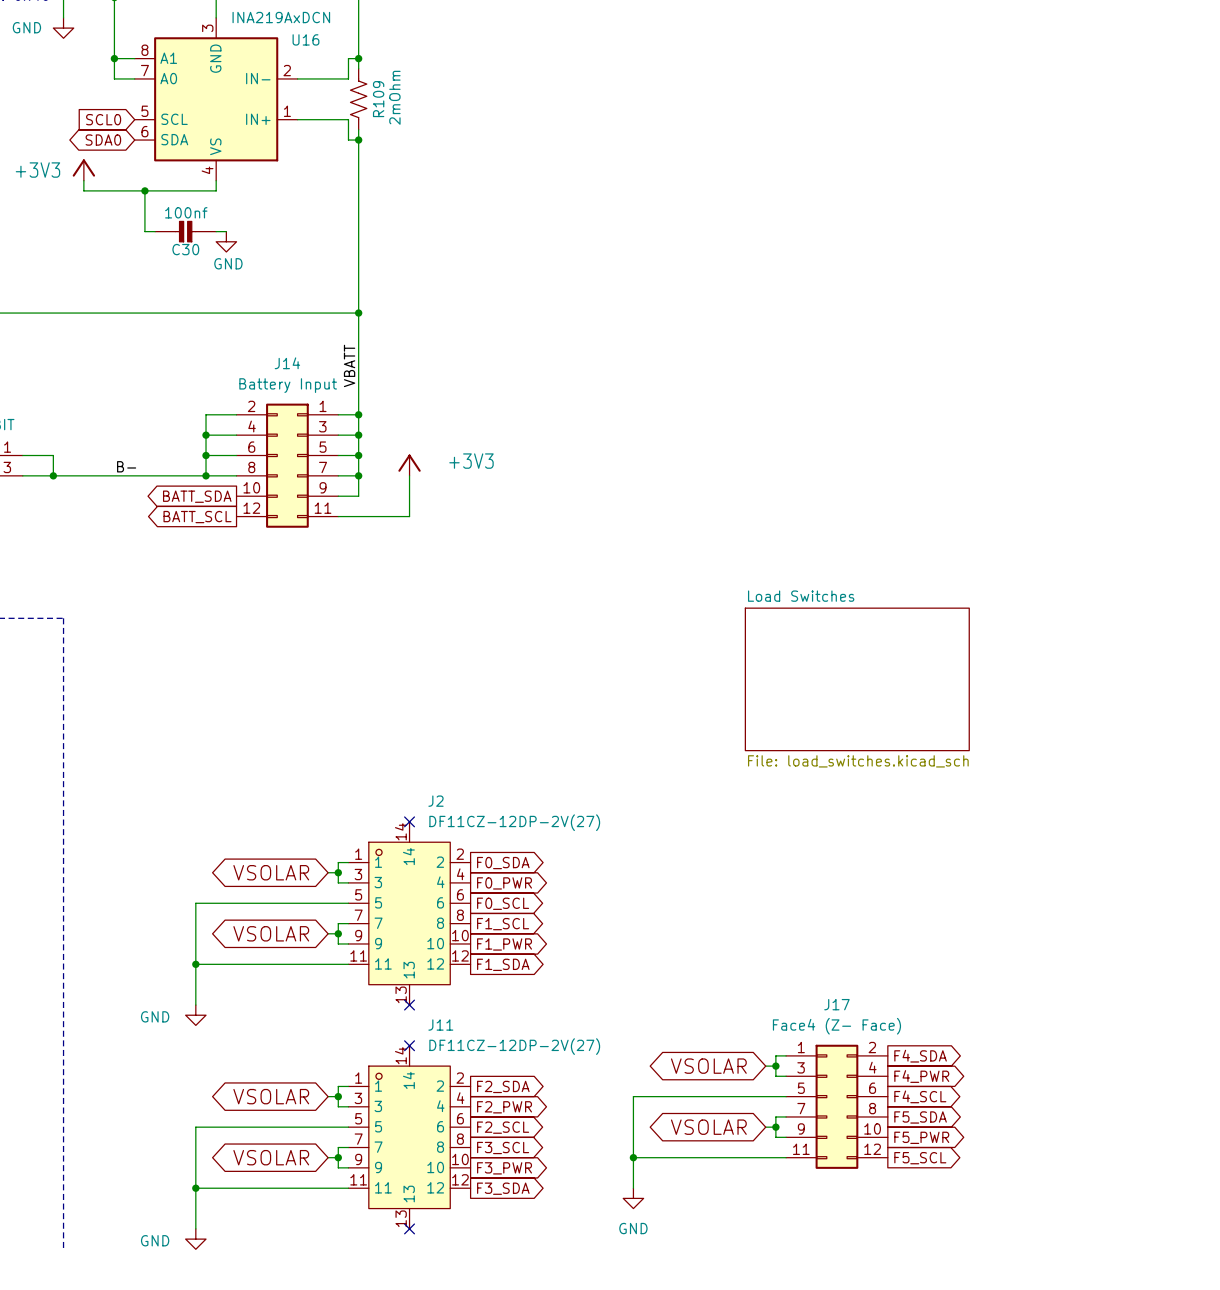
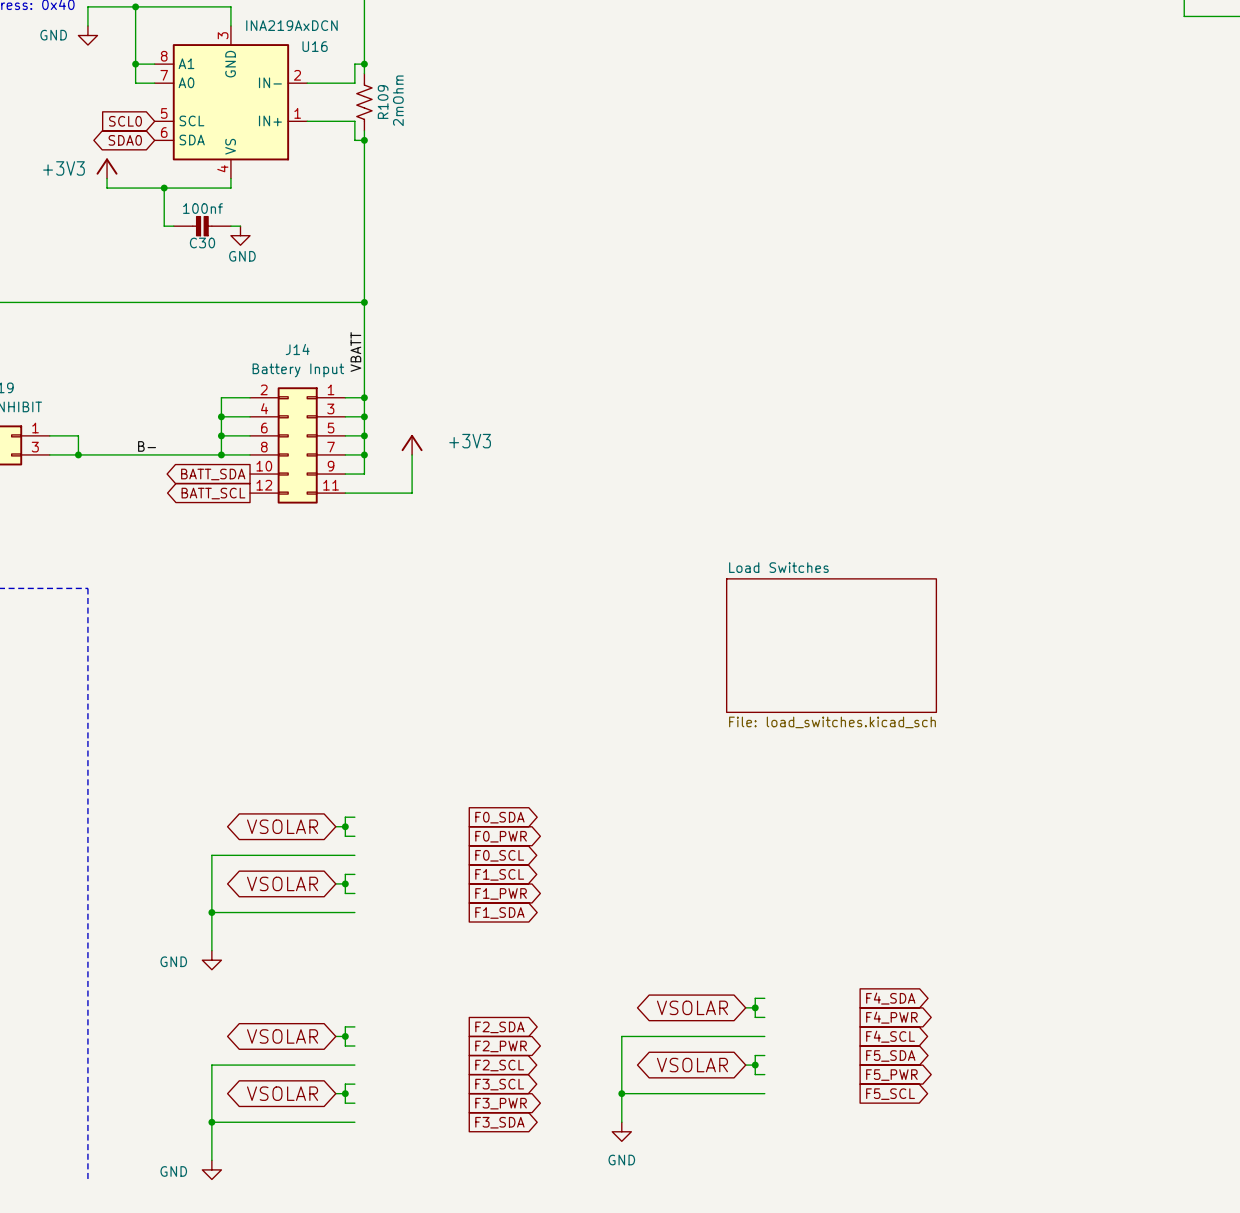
no-connect mark: (409, 821) -> none
J2: DF11CZ-12DP-2V(27) (409, 913) -> none
no-connect mark: (409, 1005) -> none
no-connect mark: (409, 1045) -> none
J17: Face4 (Z- Face) (836, 1106) -> none
J11: DF11CZ-12DP-2V(27) (409, 1137) -> none
no-connect mark: (409, 1228) -> none

